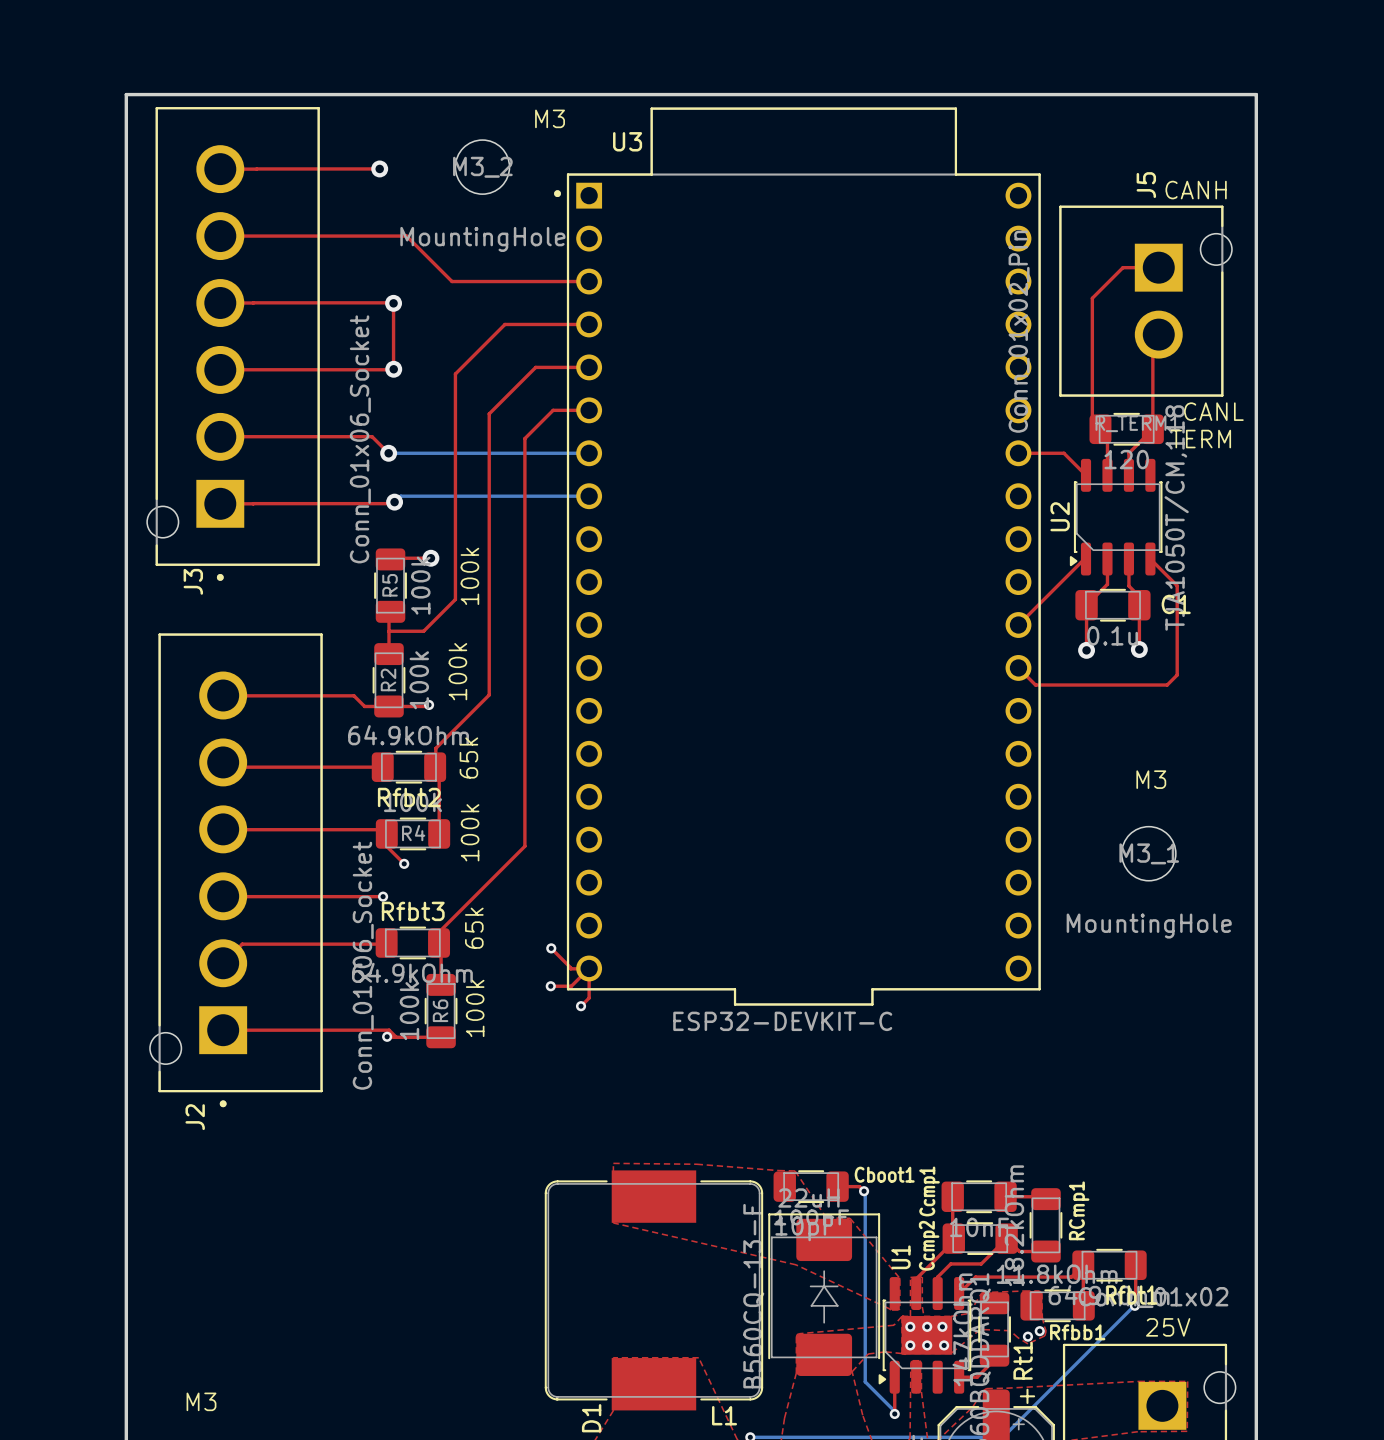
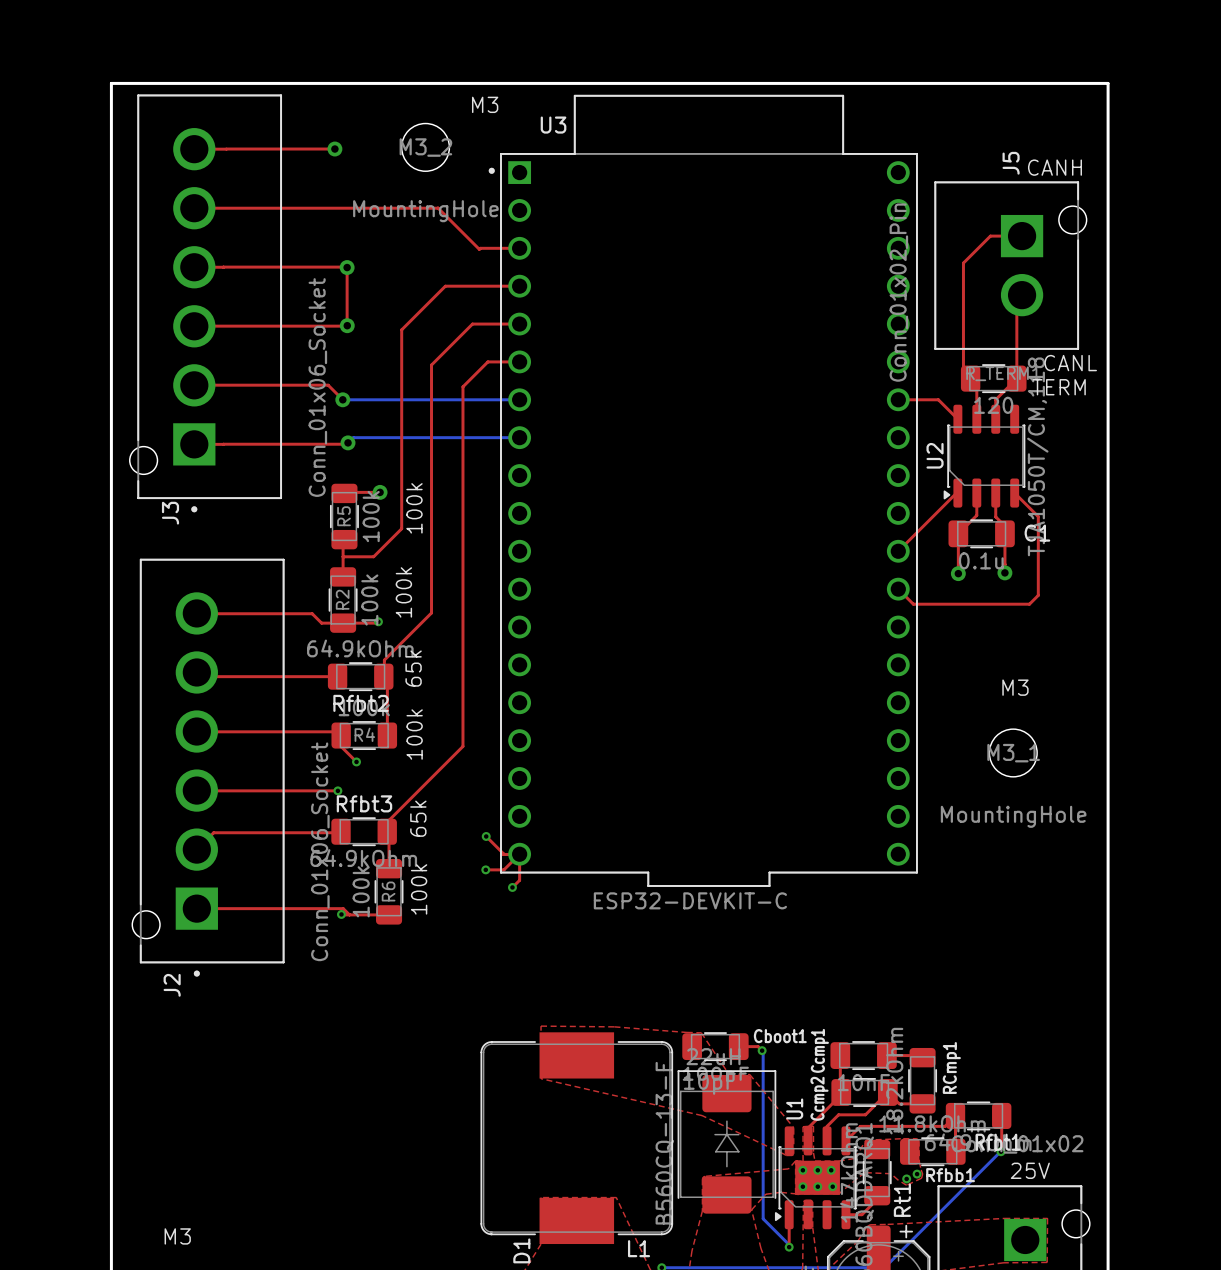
top track: none -> (438, 208) (480, 248)
top track: (406, 236) (452, 281) (544, 281) -> (358, 208) (437, 208)

